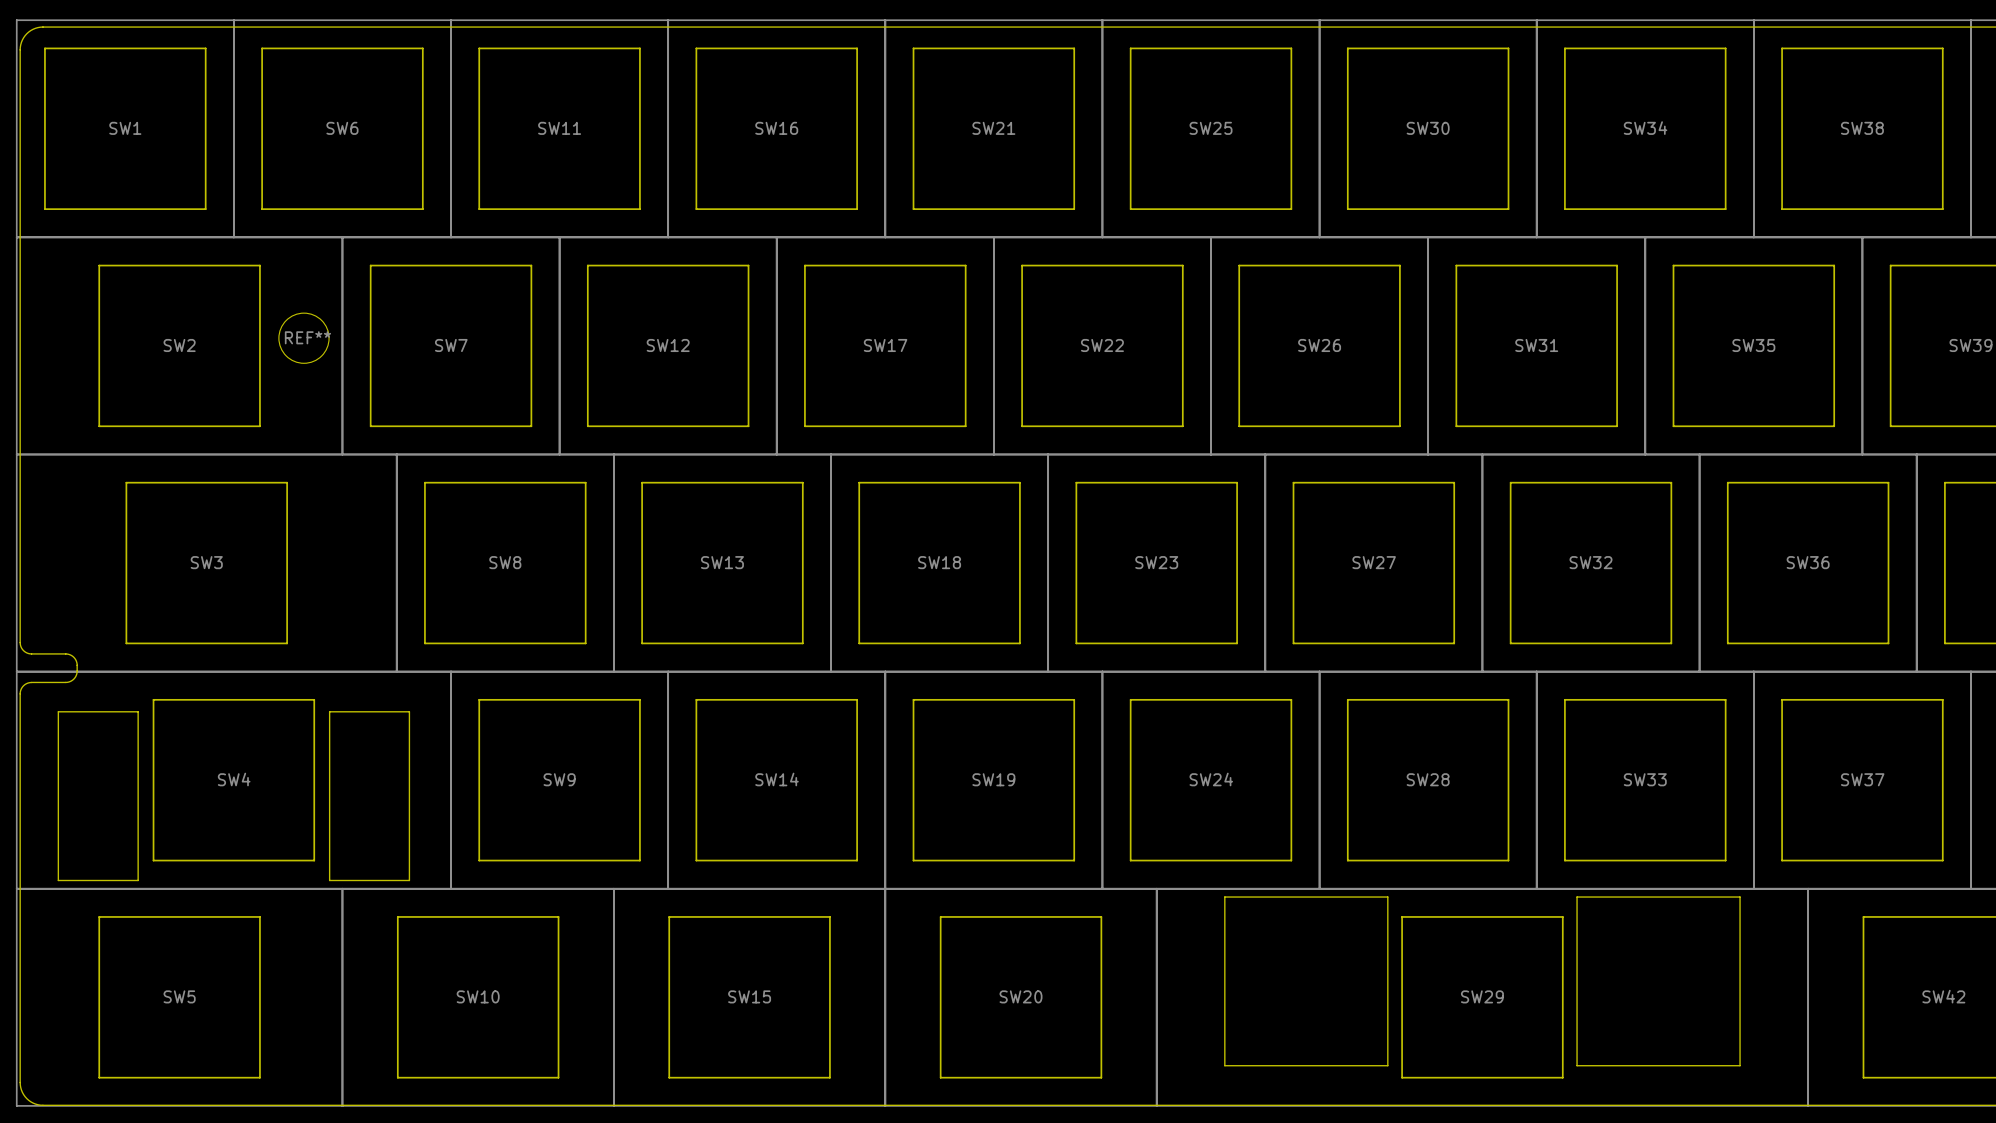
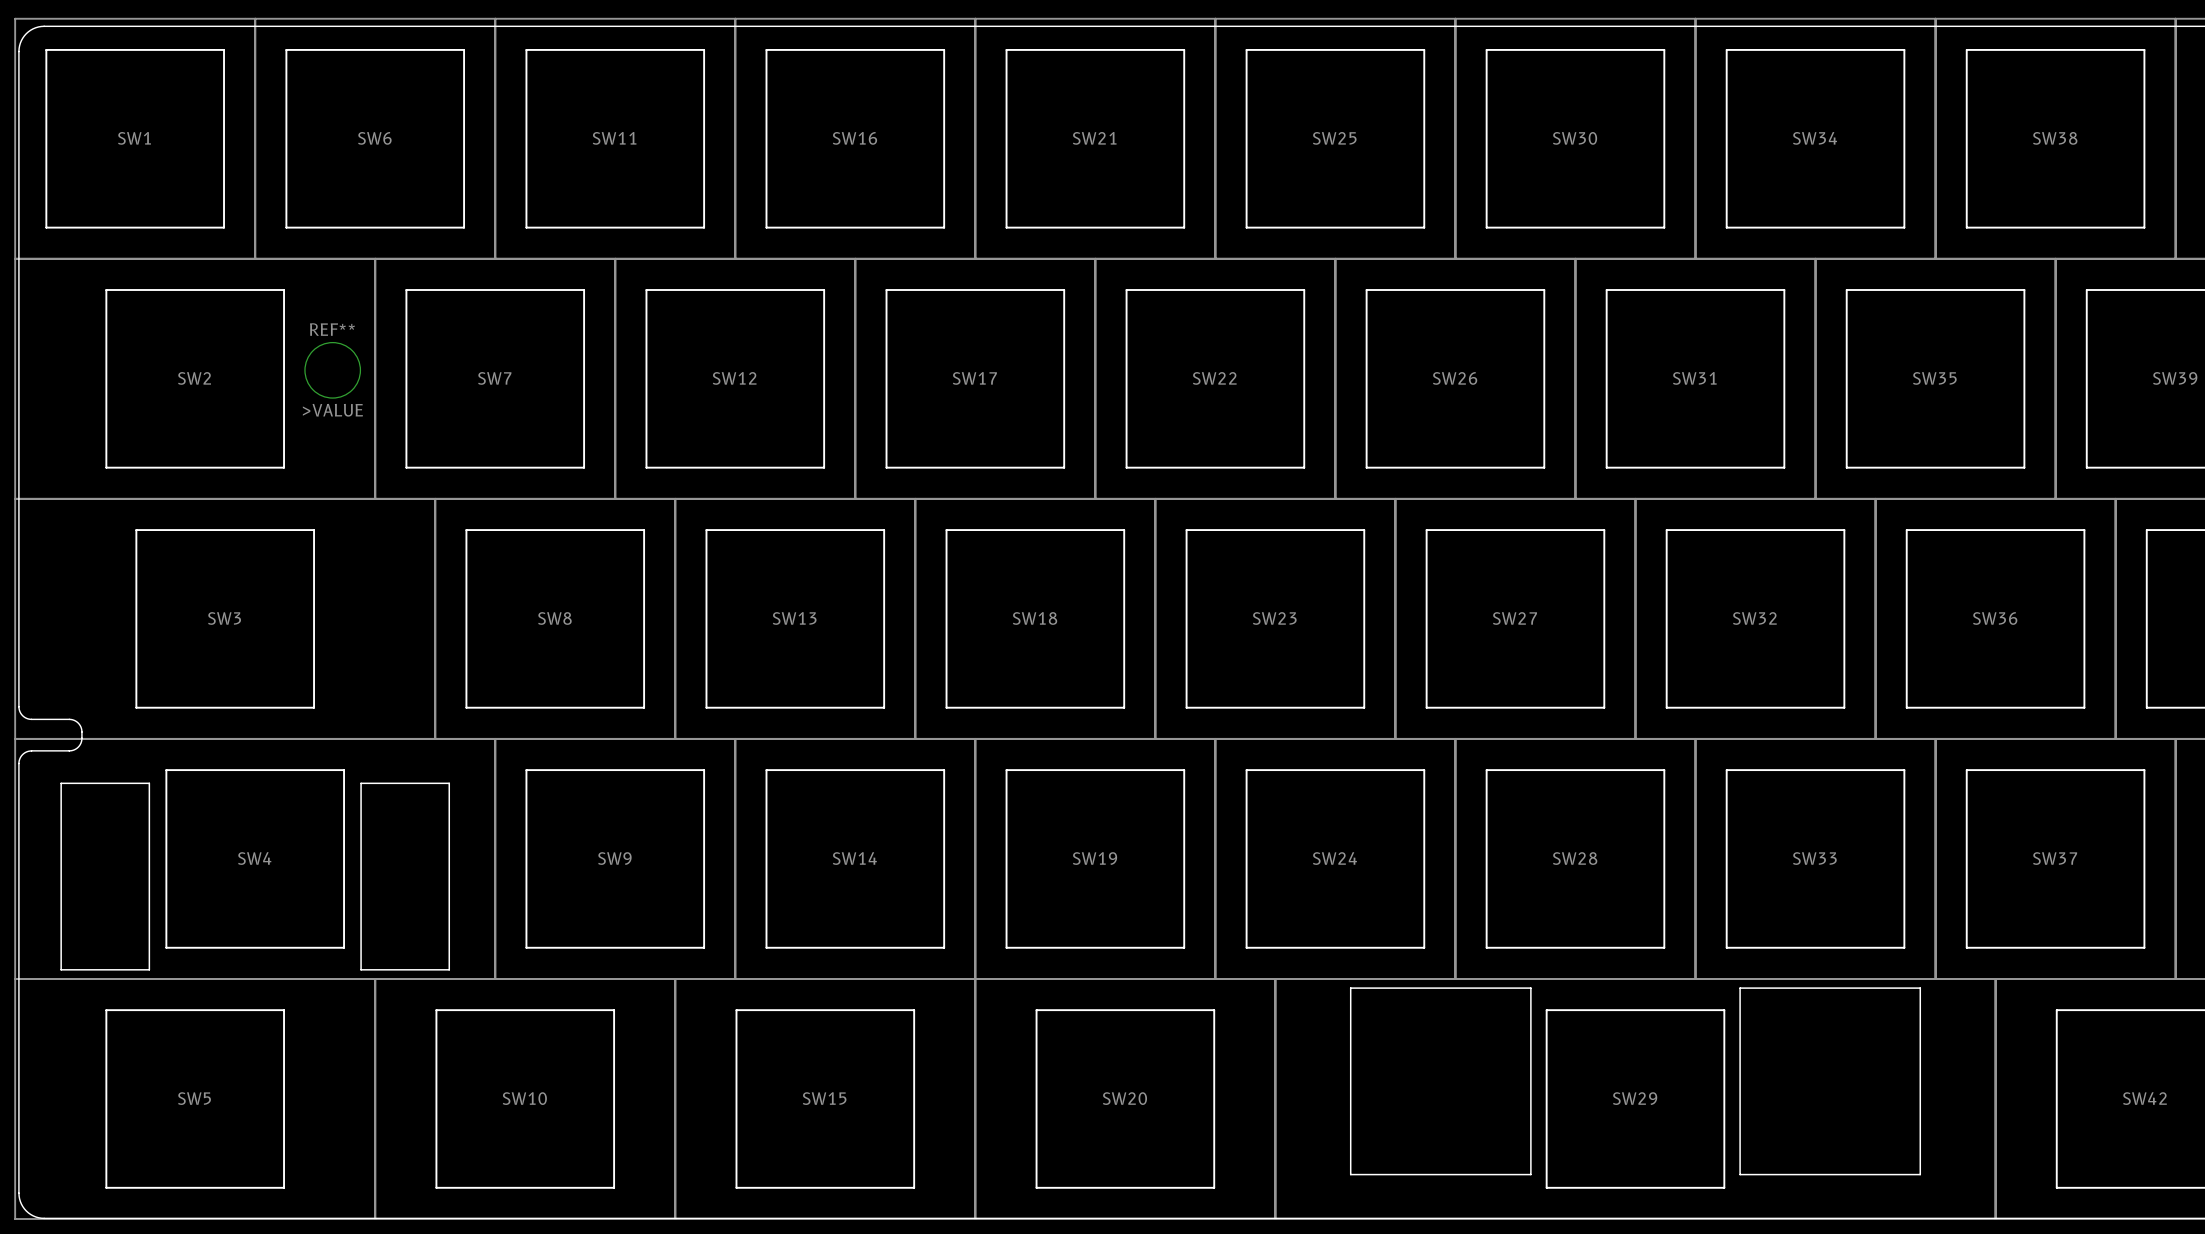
REF** name position: REF** (307, 337) -> REF** (332, 329)
REF** value: none -> >VALUE (332, 410)

